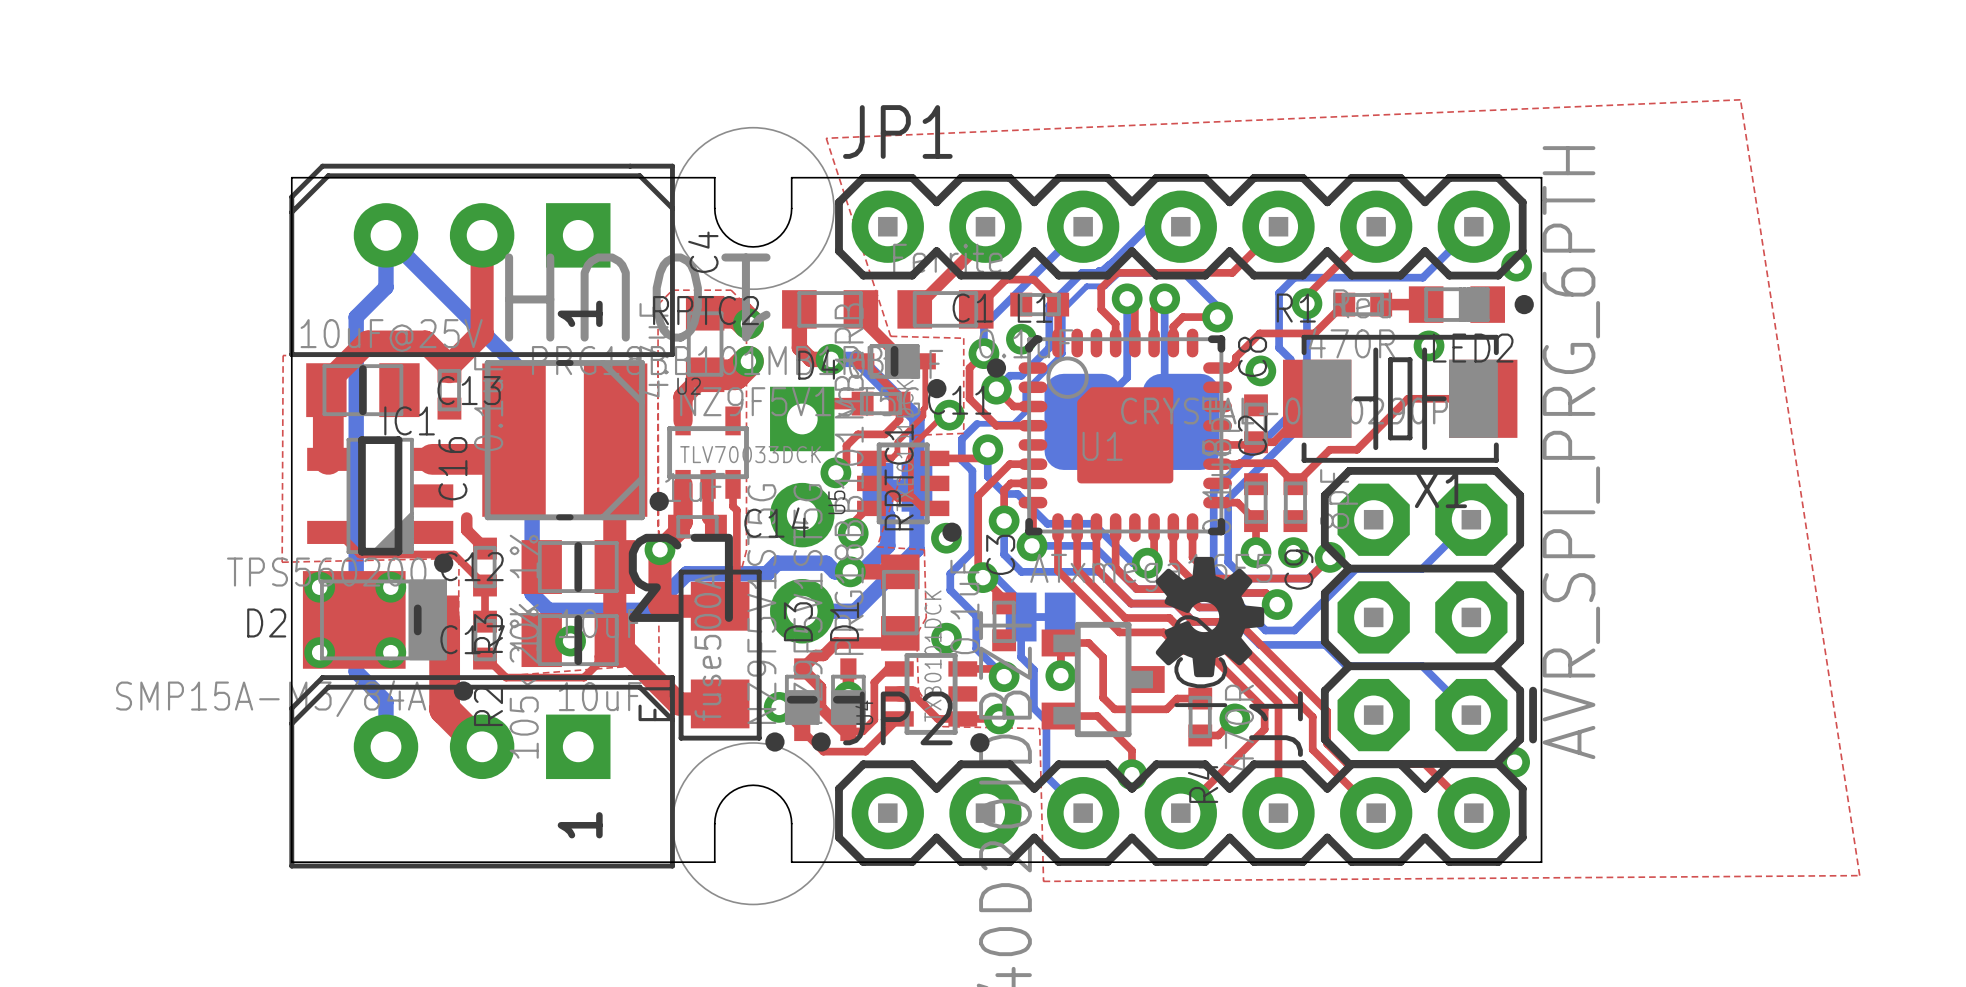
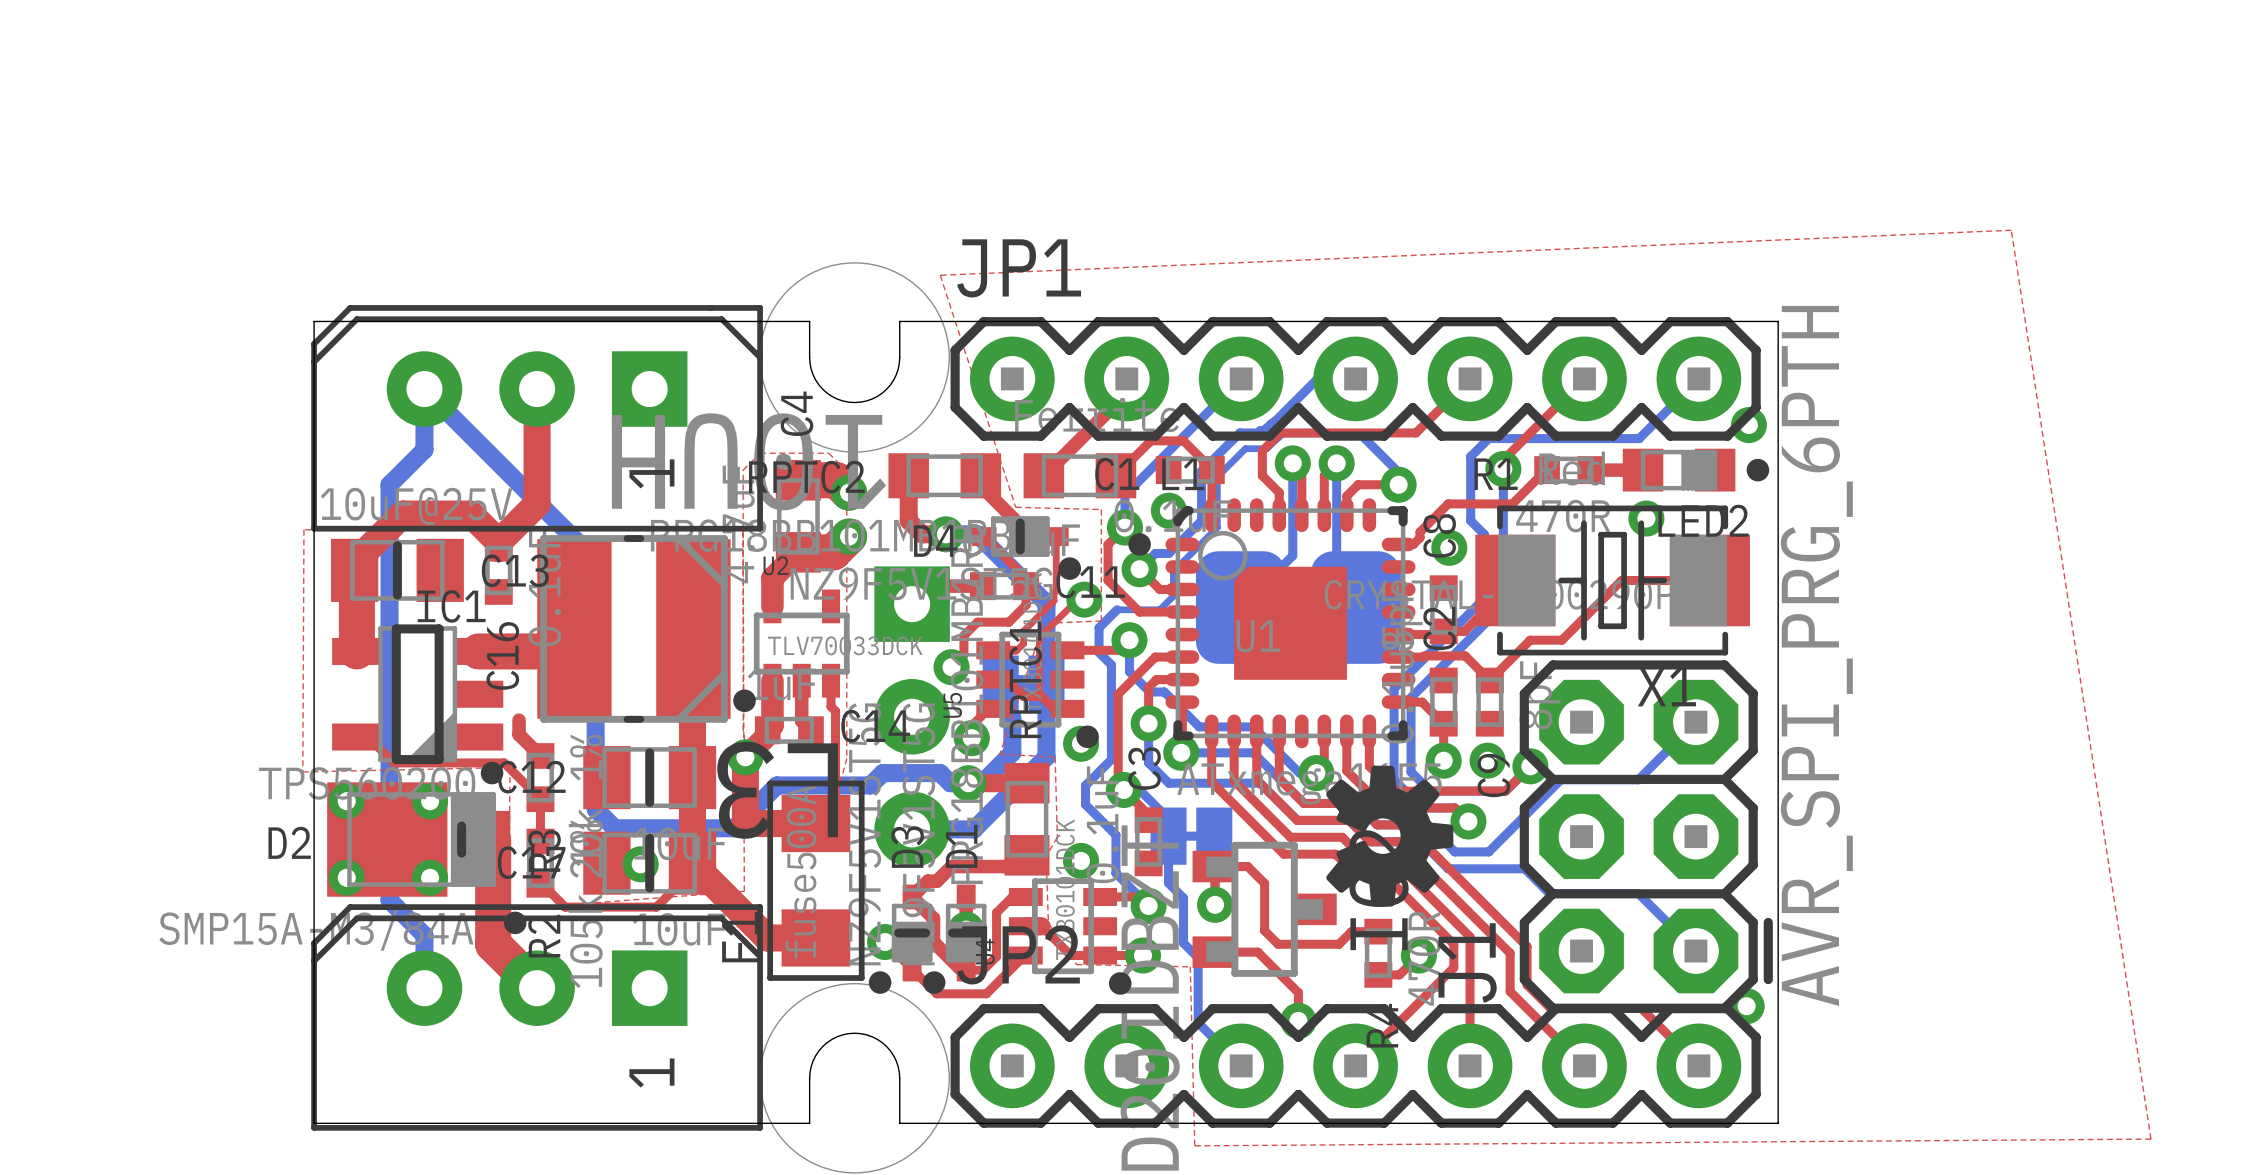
part footprint: [986, 328, 1232, 543] -> [1128, 498, 1416, 749]

